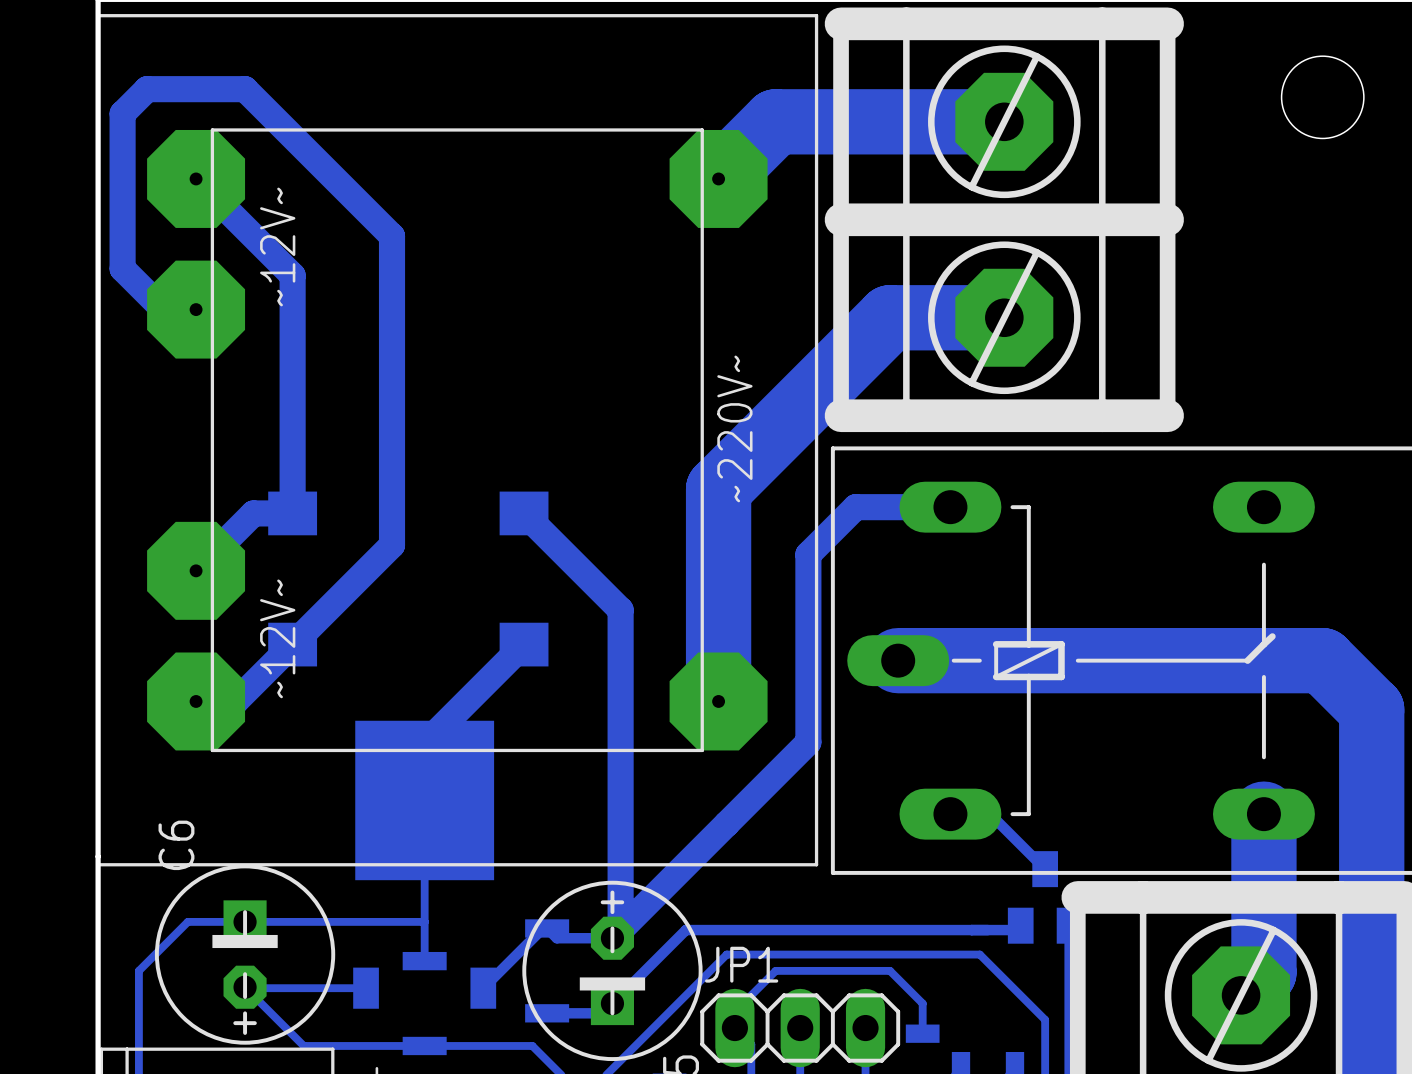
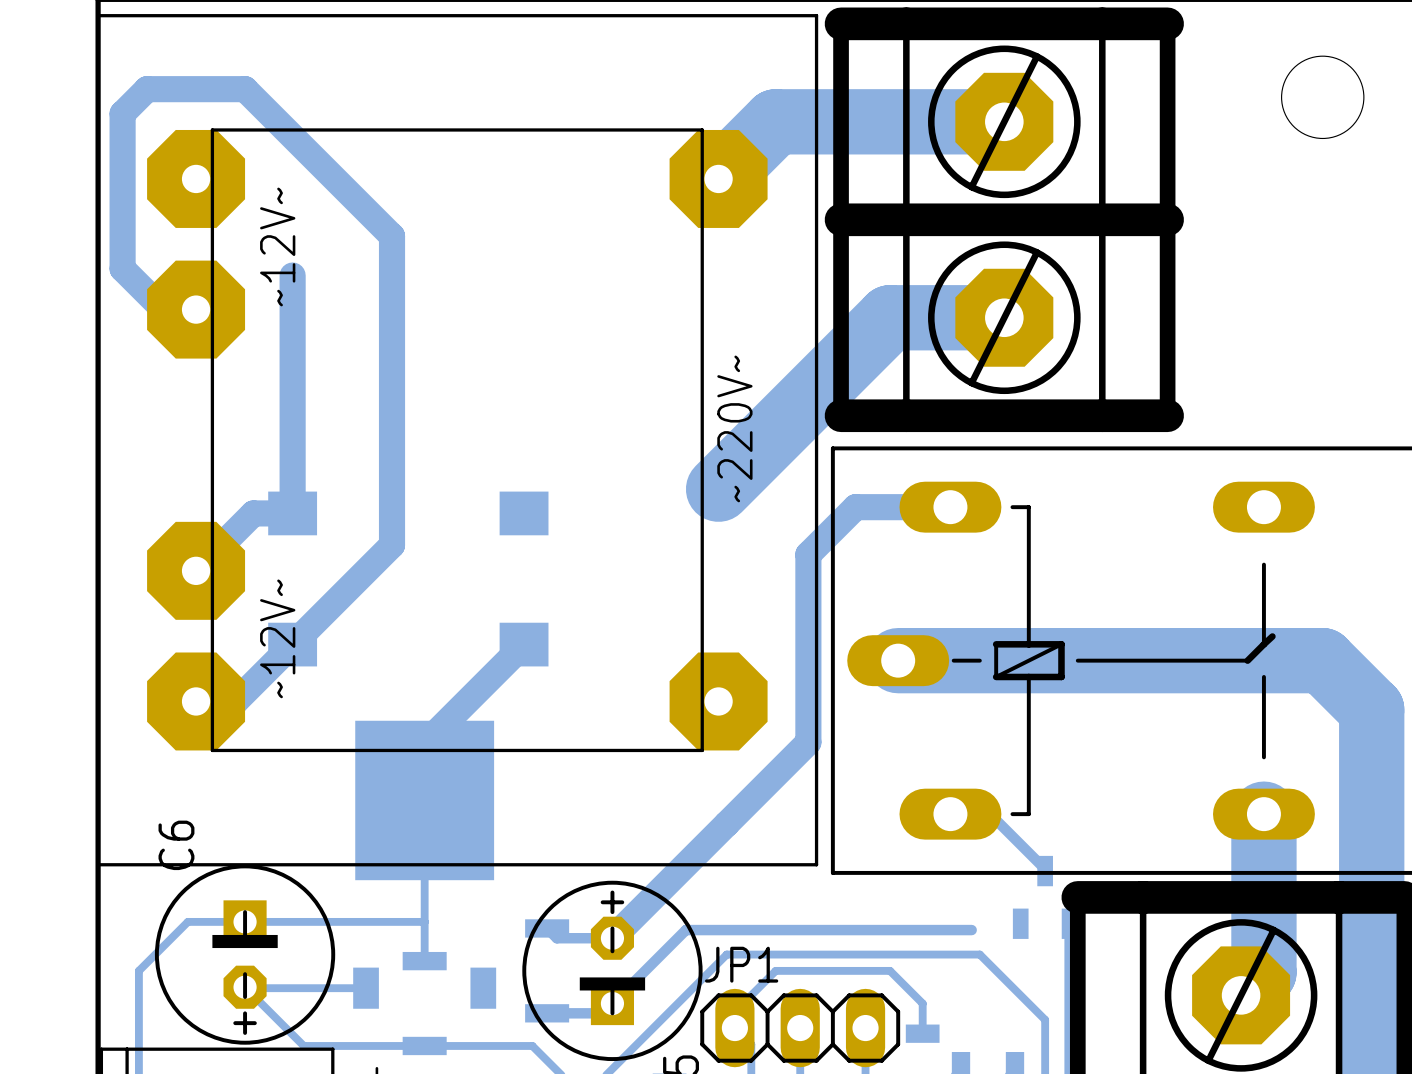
part footprint: [96, 14, 819, 867] -> [96, 14, 819, 867]
bottom track: (196, 178) (292, 275) -> none
bottom track: (718, 489) (718, 701) -> none
bottom track: (524, 513) (620, 609) (620, 930) -> none
part footprint: [1007, 851, 1083, 944] -> [1012, 855, 1078, 939]
bottom track: (1020, 925) (1016, 930) (971, 930) -> none
bottom track: (543, 928) (483, 988) -> none

